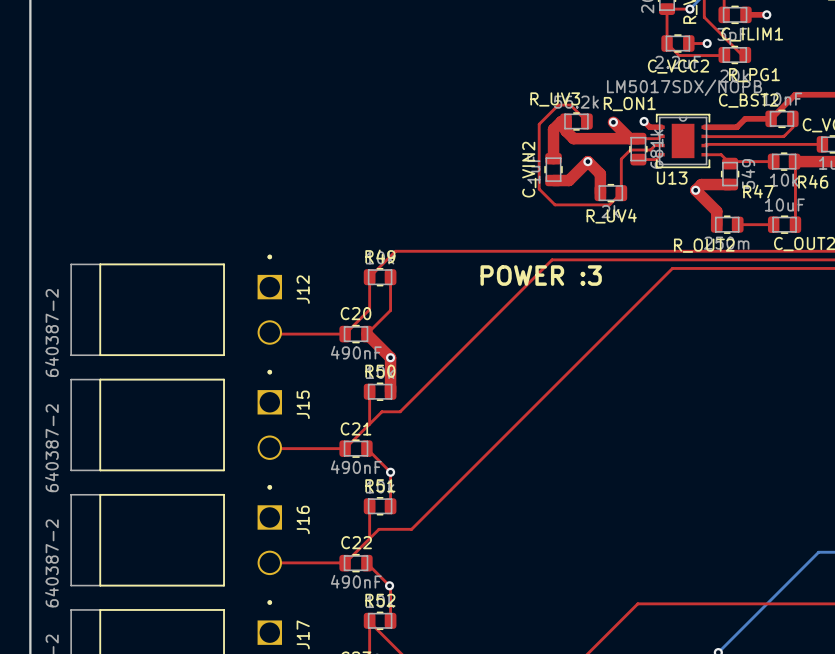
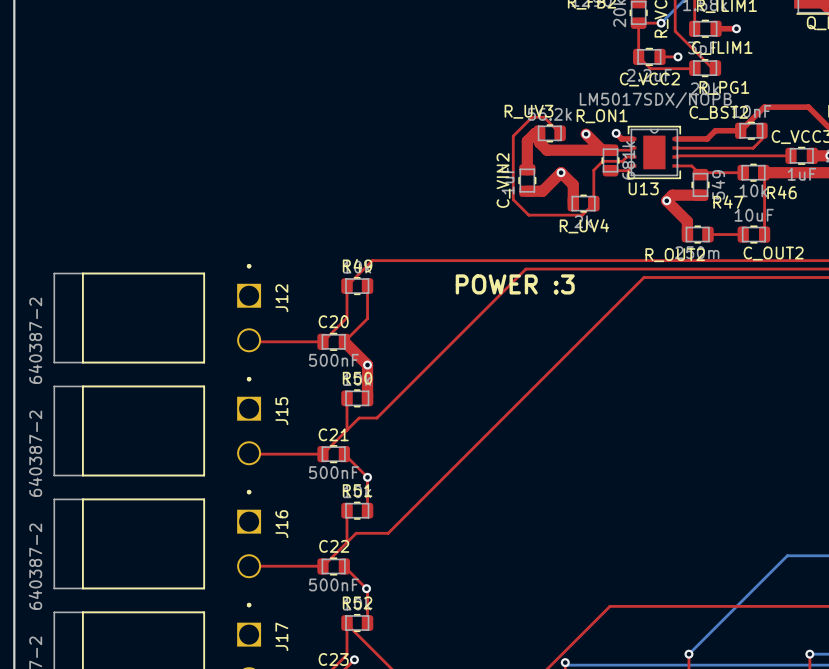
C20 value: 490nF (356, 352) -> 500nF (333, 360)
C21 value: 490nF (356, 467) -> 500nF (333, 472)
C22 value: 490nF (356, 581) -> 500nF (333, 584)

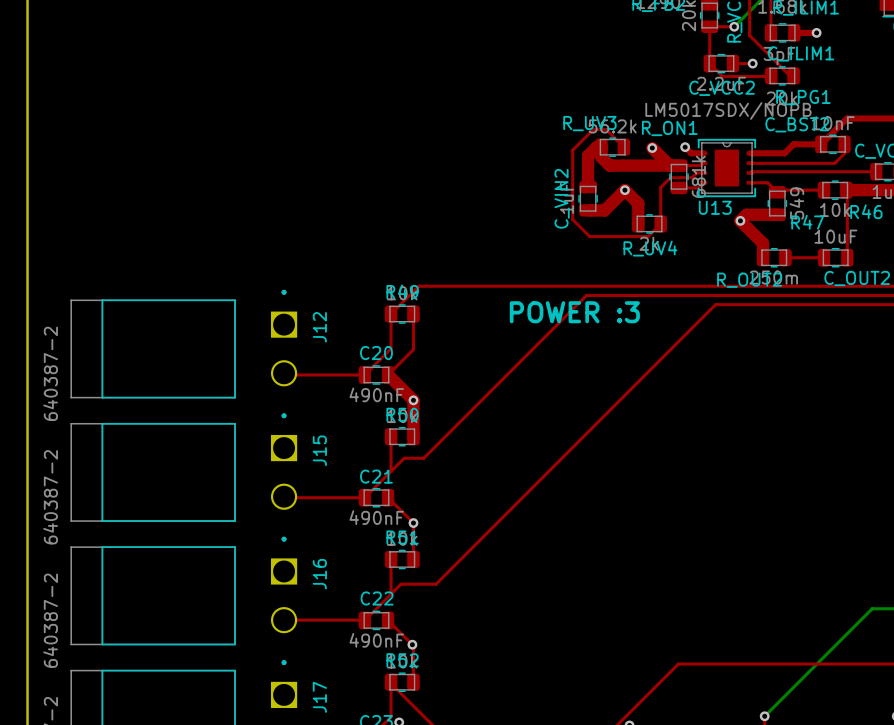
C20 value: 500nF (333, 360) -> 490nF (376, 394)
C21 value: 500nF (333, 472) -> 490nF (376, 517)
C22 value: 500nF (333, 584) -> 490nF (376, 640)

